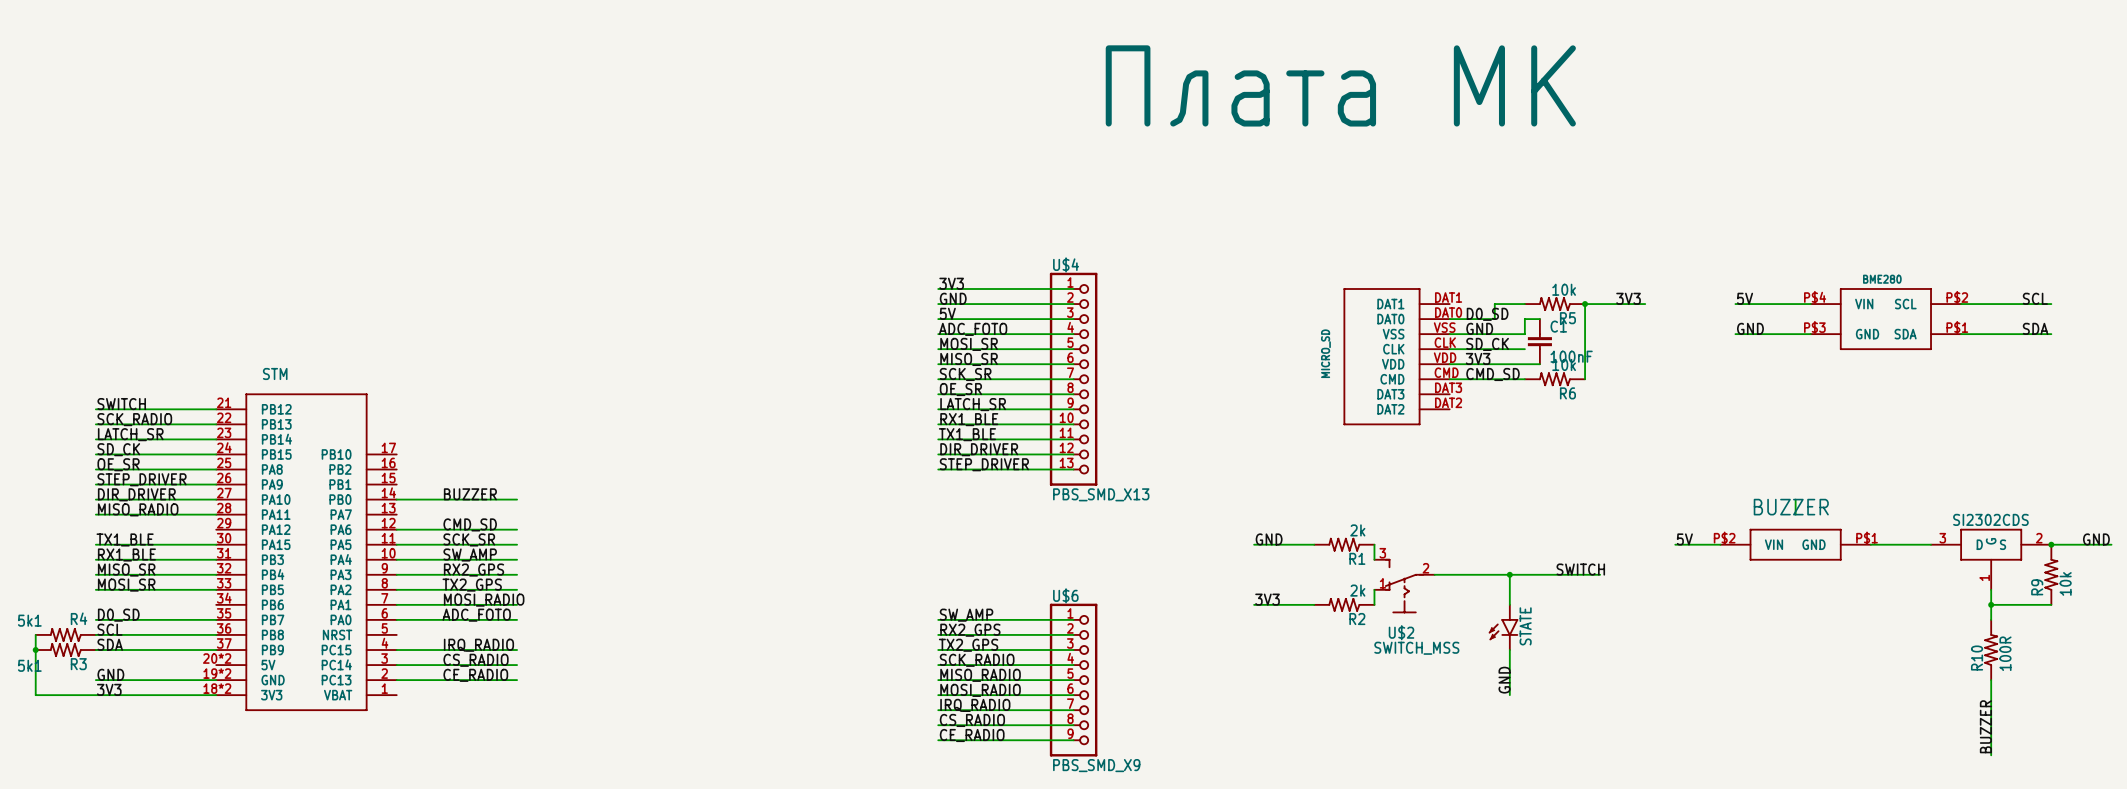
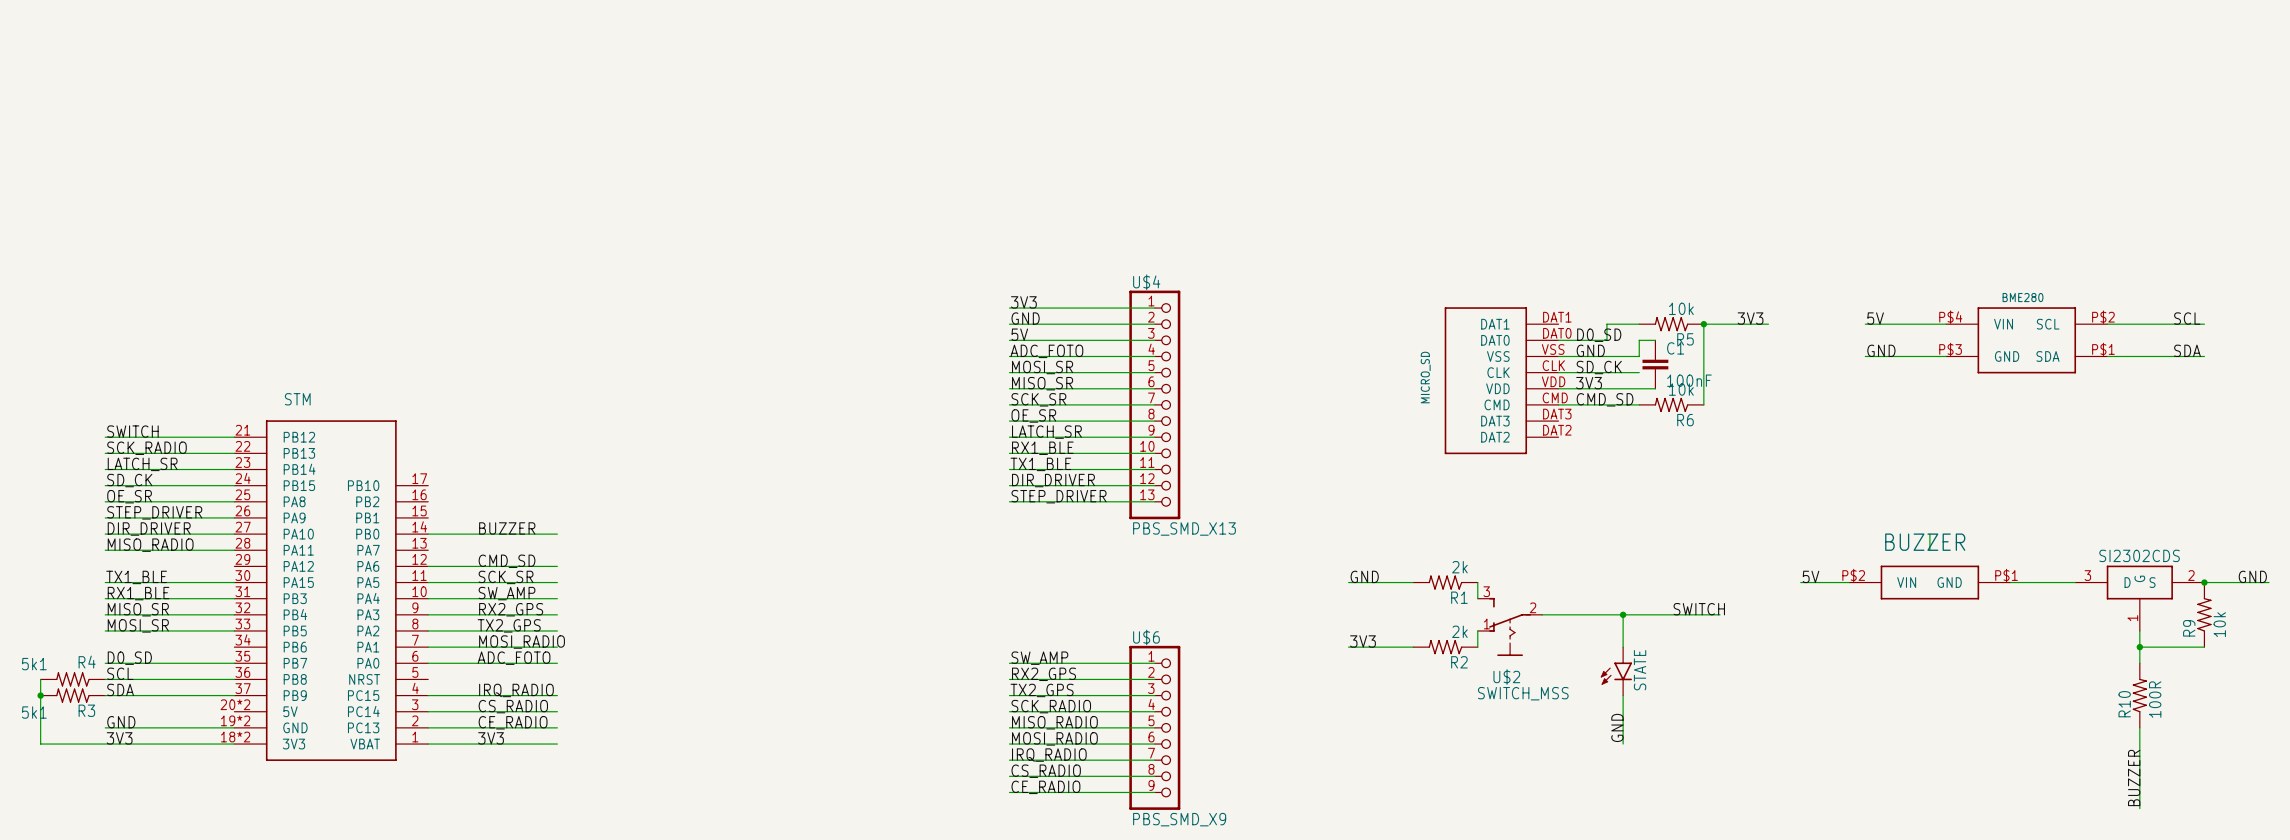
part: Плата МК (1340, 85) -> none
label: none -> 3V3 (491, 738)
wire: none -> (428, 744) (557, 744)

